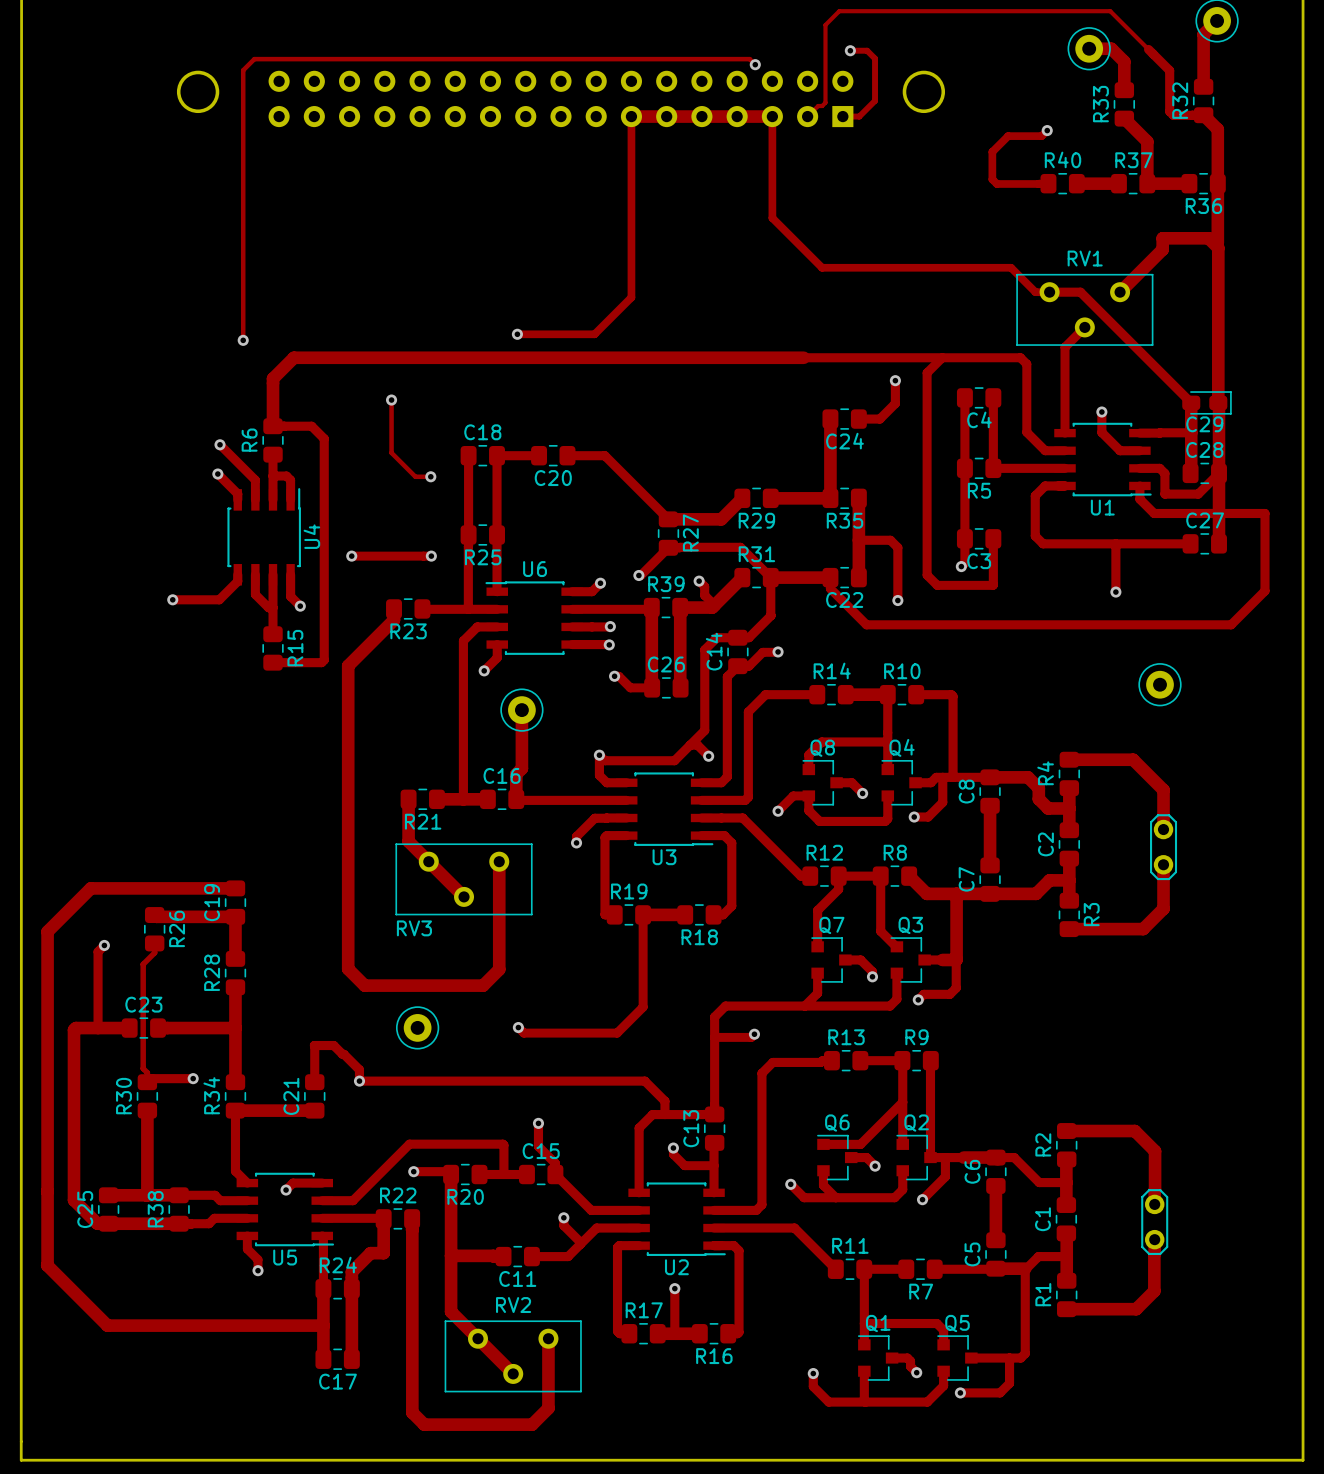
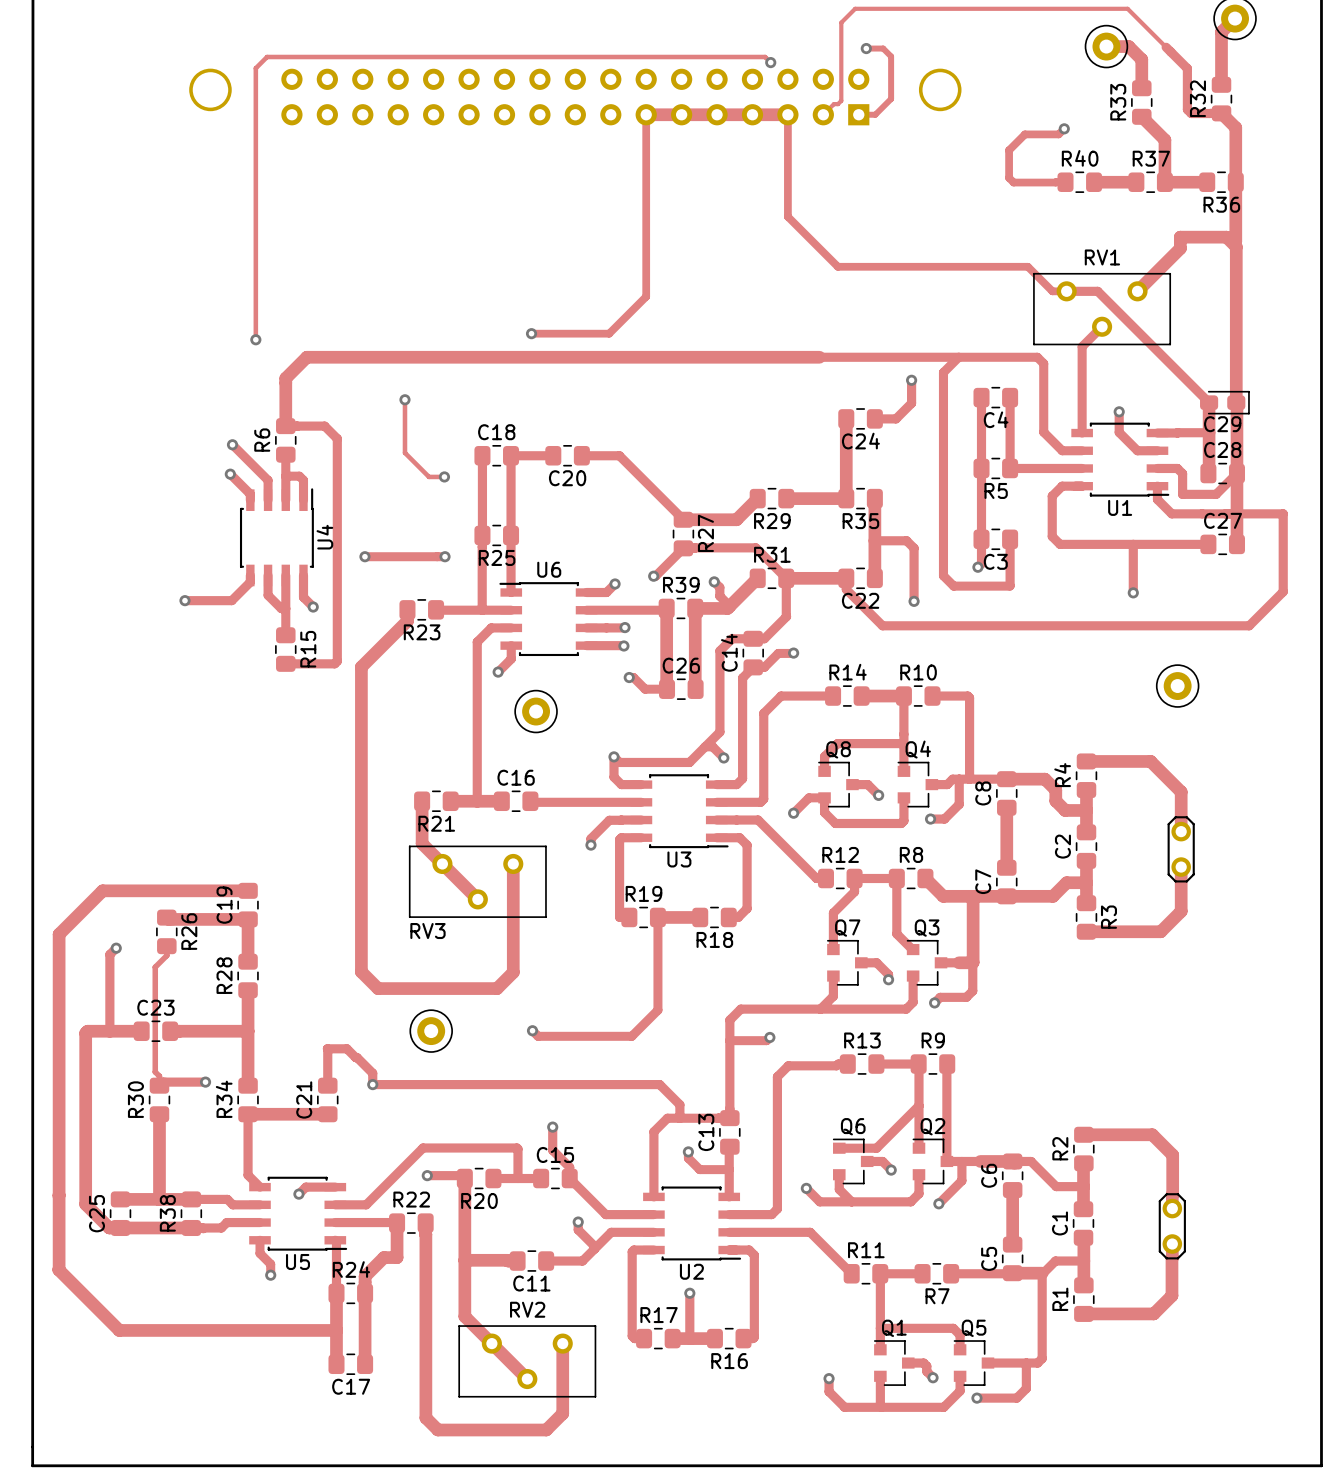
track: (521, 710) (521, 768) (516, 774) (516, 799) -> none

